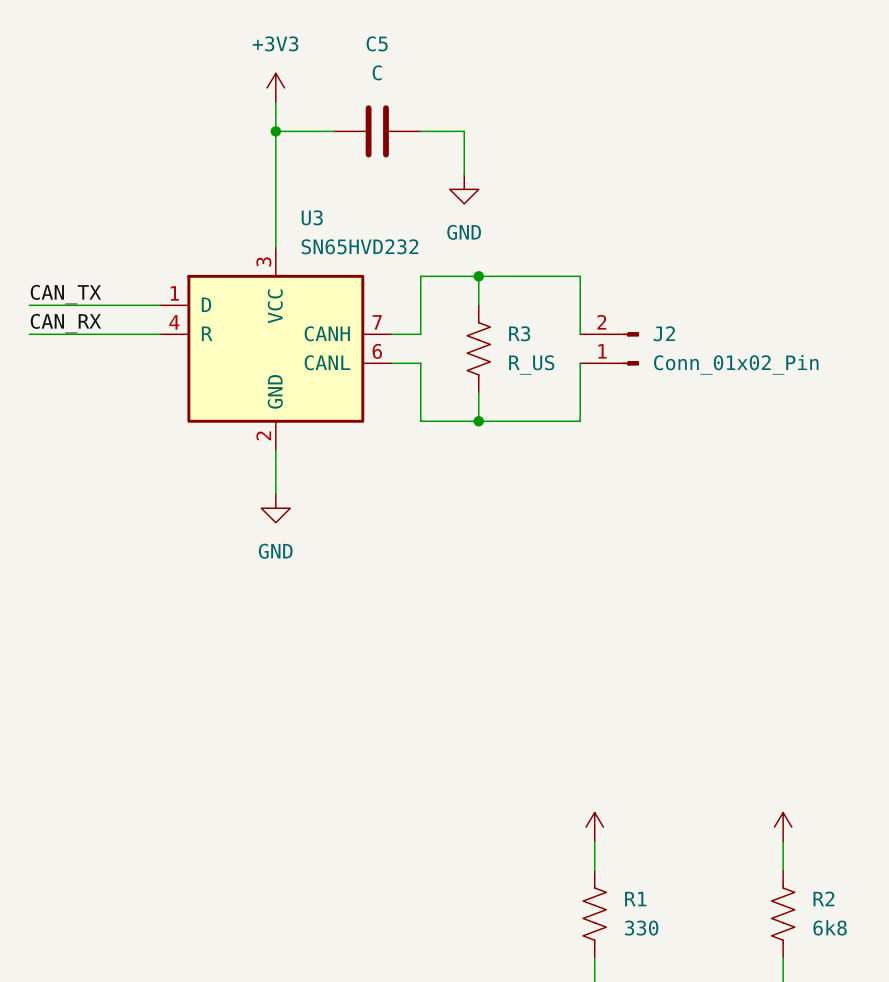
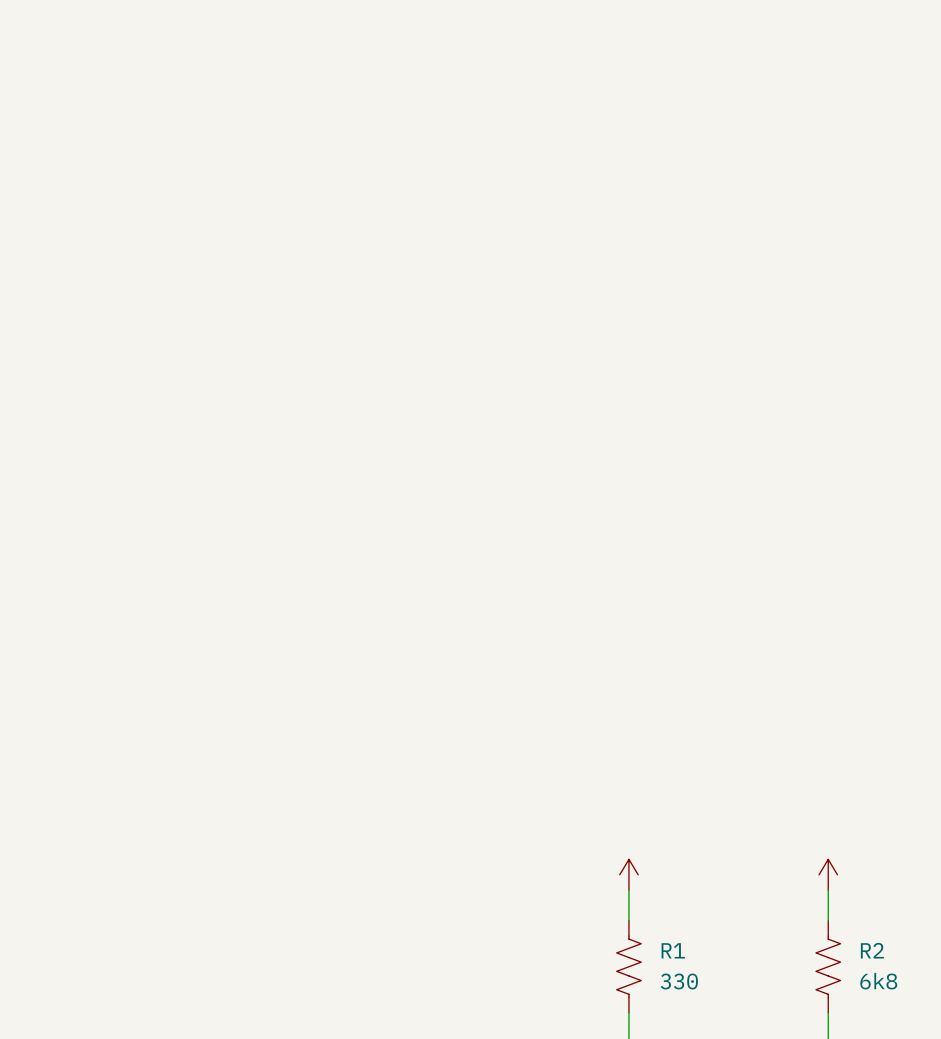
power symbol: +3V3 (275, 87) -> none
wire: (275, 102) (275, 247) -> none
wire: (275, 131) (333, 131) -> none
junction: (275, 131) -> none
C5: C (377, 131) -> none
wire: (420, 131) (464, 131) (464, 174) -> none
power symbol: GND (464, 189) -> none
wire: (478, 276) (478, 305) -> none
junction: (478, 276) -> none
label: CAN_TX (65, 294) -> none
wire: (29, 305) (159, 305) -> none
label: CAN_RX (65, 323) -> none
wire: (29, 334) (159, 334) -> none
wire: (391, 334) (420, 334) (420, 276) (580, 276) (580, 334) -> none
U3: SN65HVD232 (275, 348) -> none
R3: R_US (478, 348) -> none
J2: Conn_01x02_Pin (609, 348) -> none
wire: (391, 363) (420, 363) (420, 421) (580, 421) (580, 363) -> none
wire: (478, 392) (478, 421) -> none
junction: (478, 421) -> none
wire: (275, 450) (275, 493) -> none
power symbol: GND (275, 508) -> none

